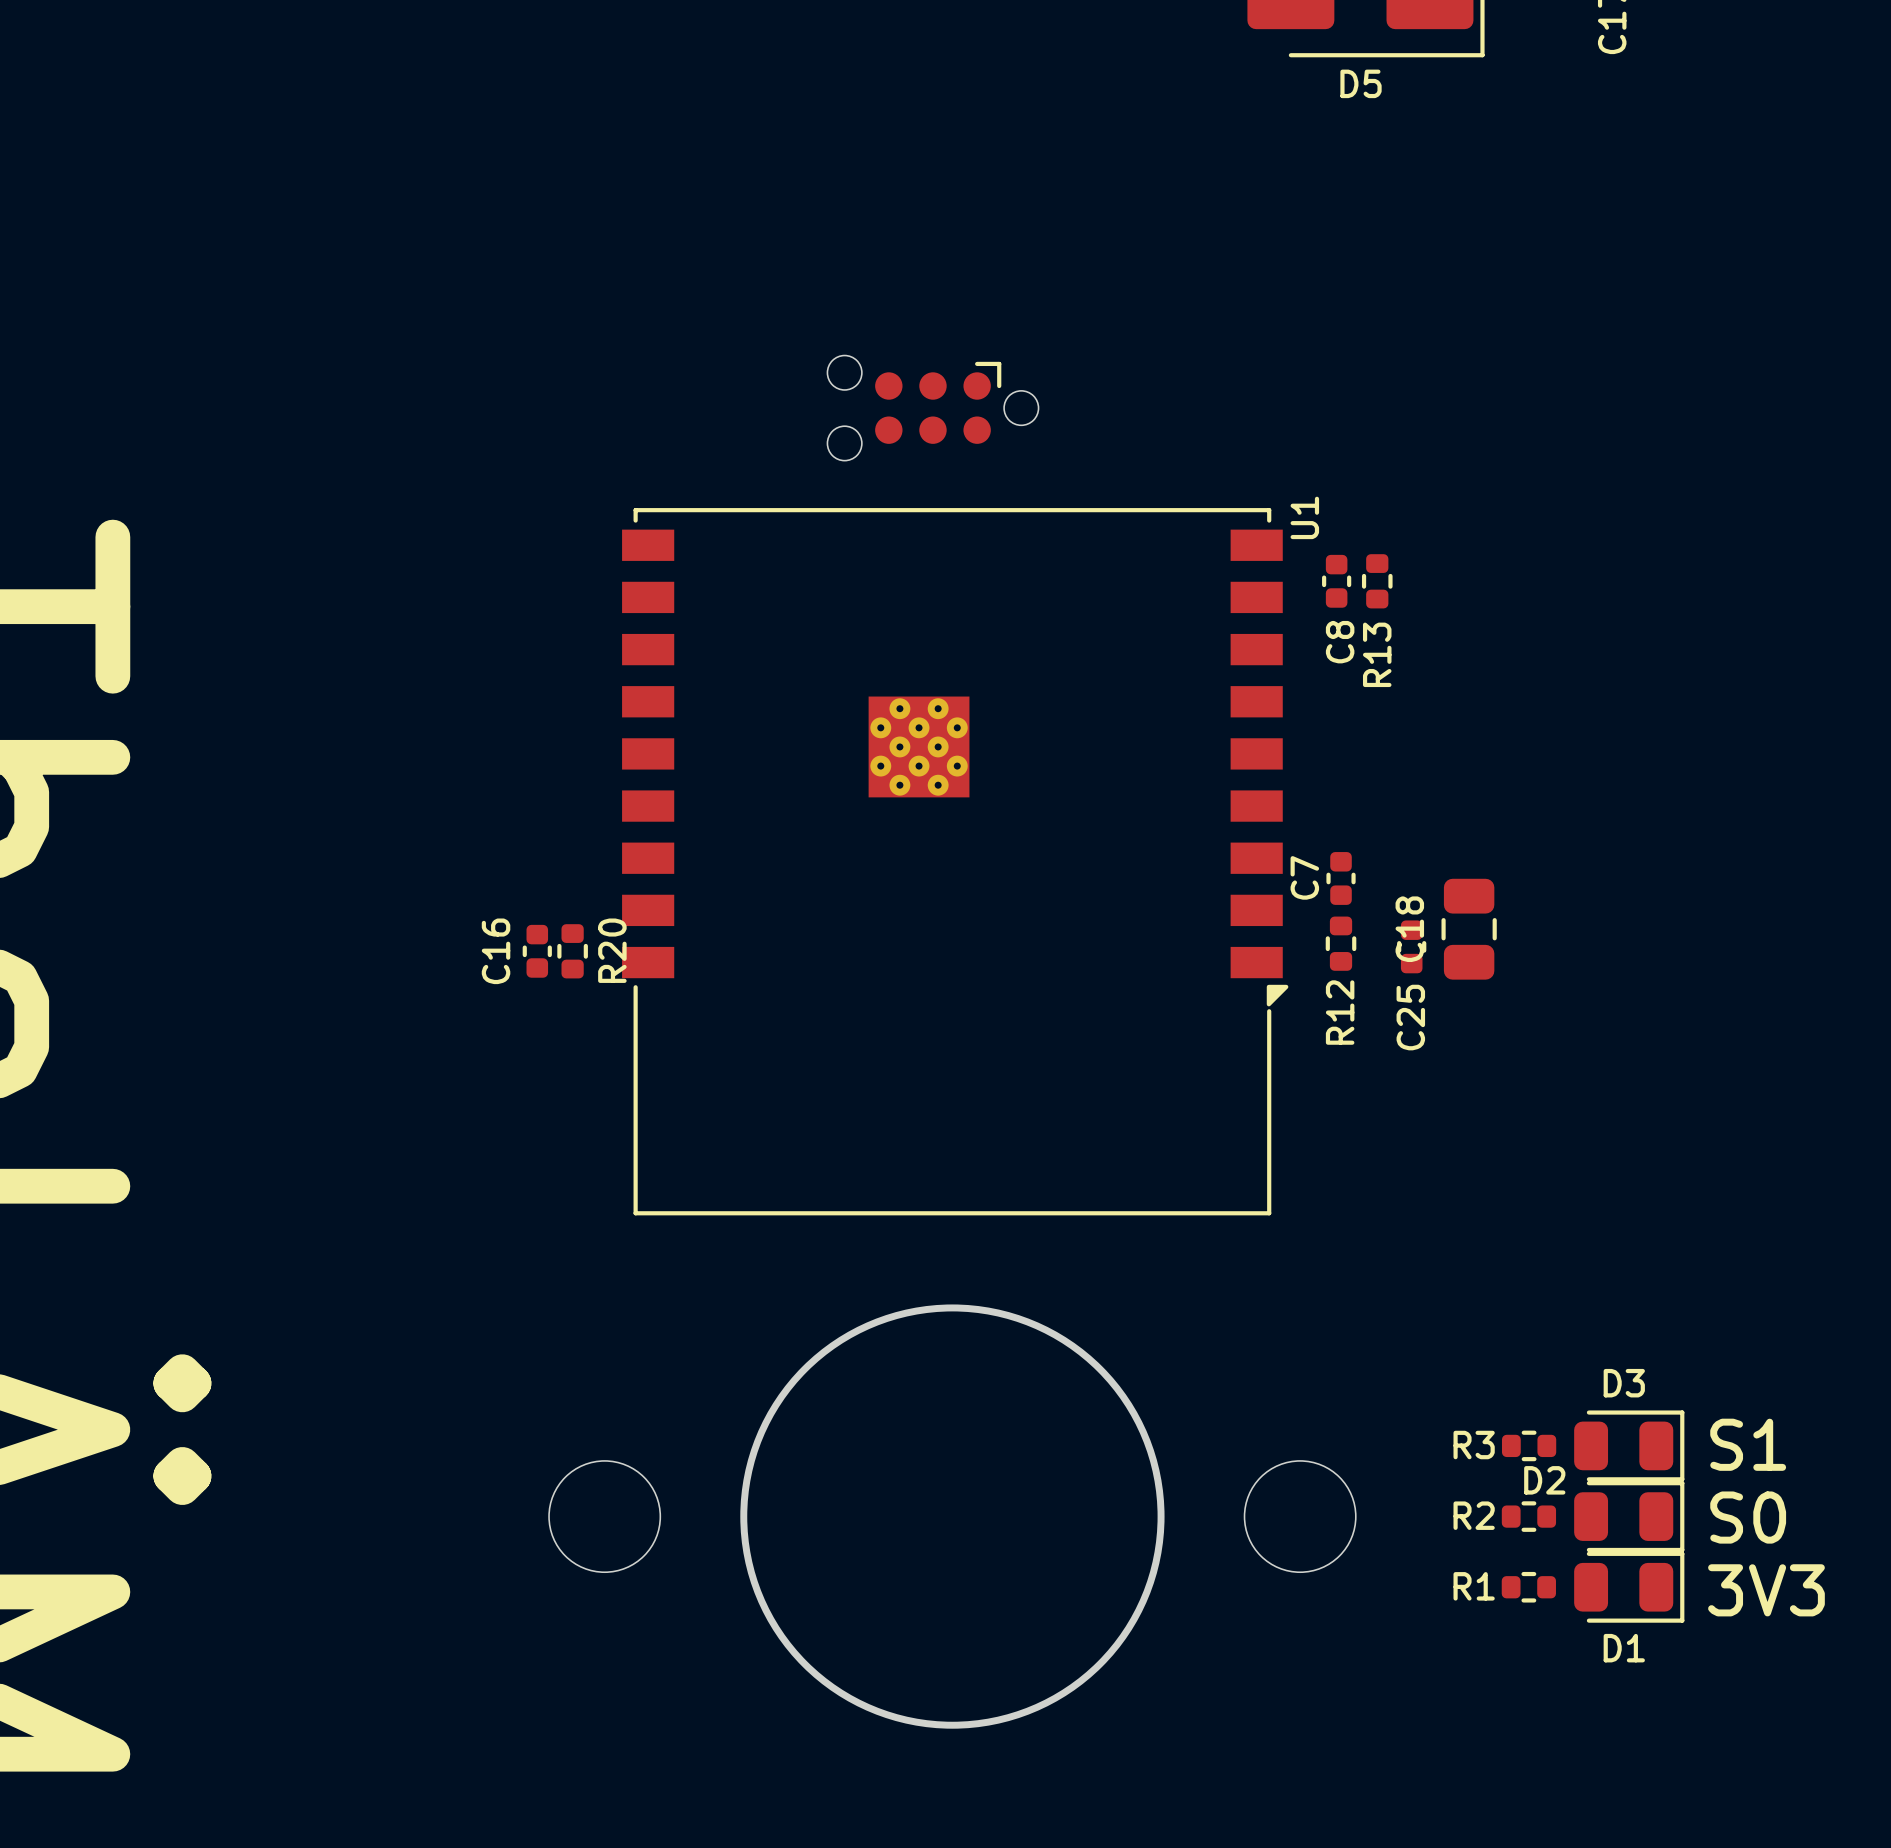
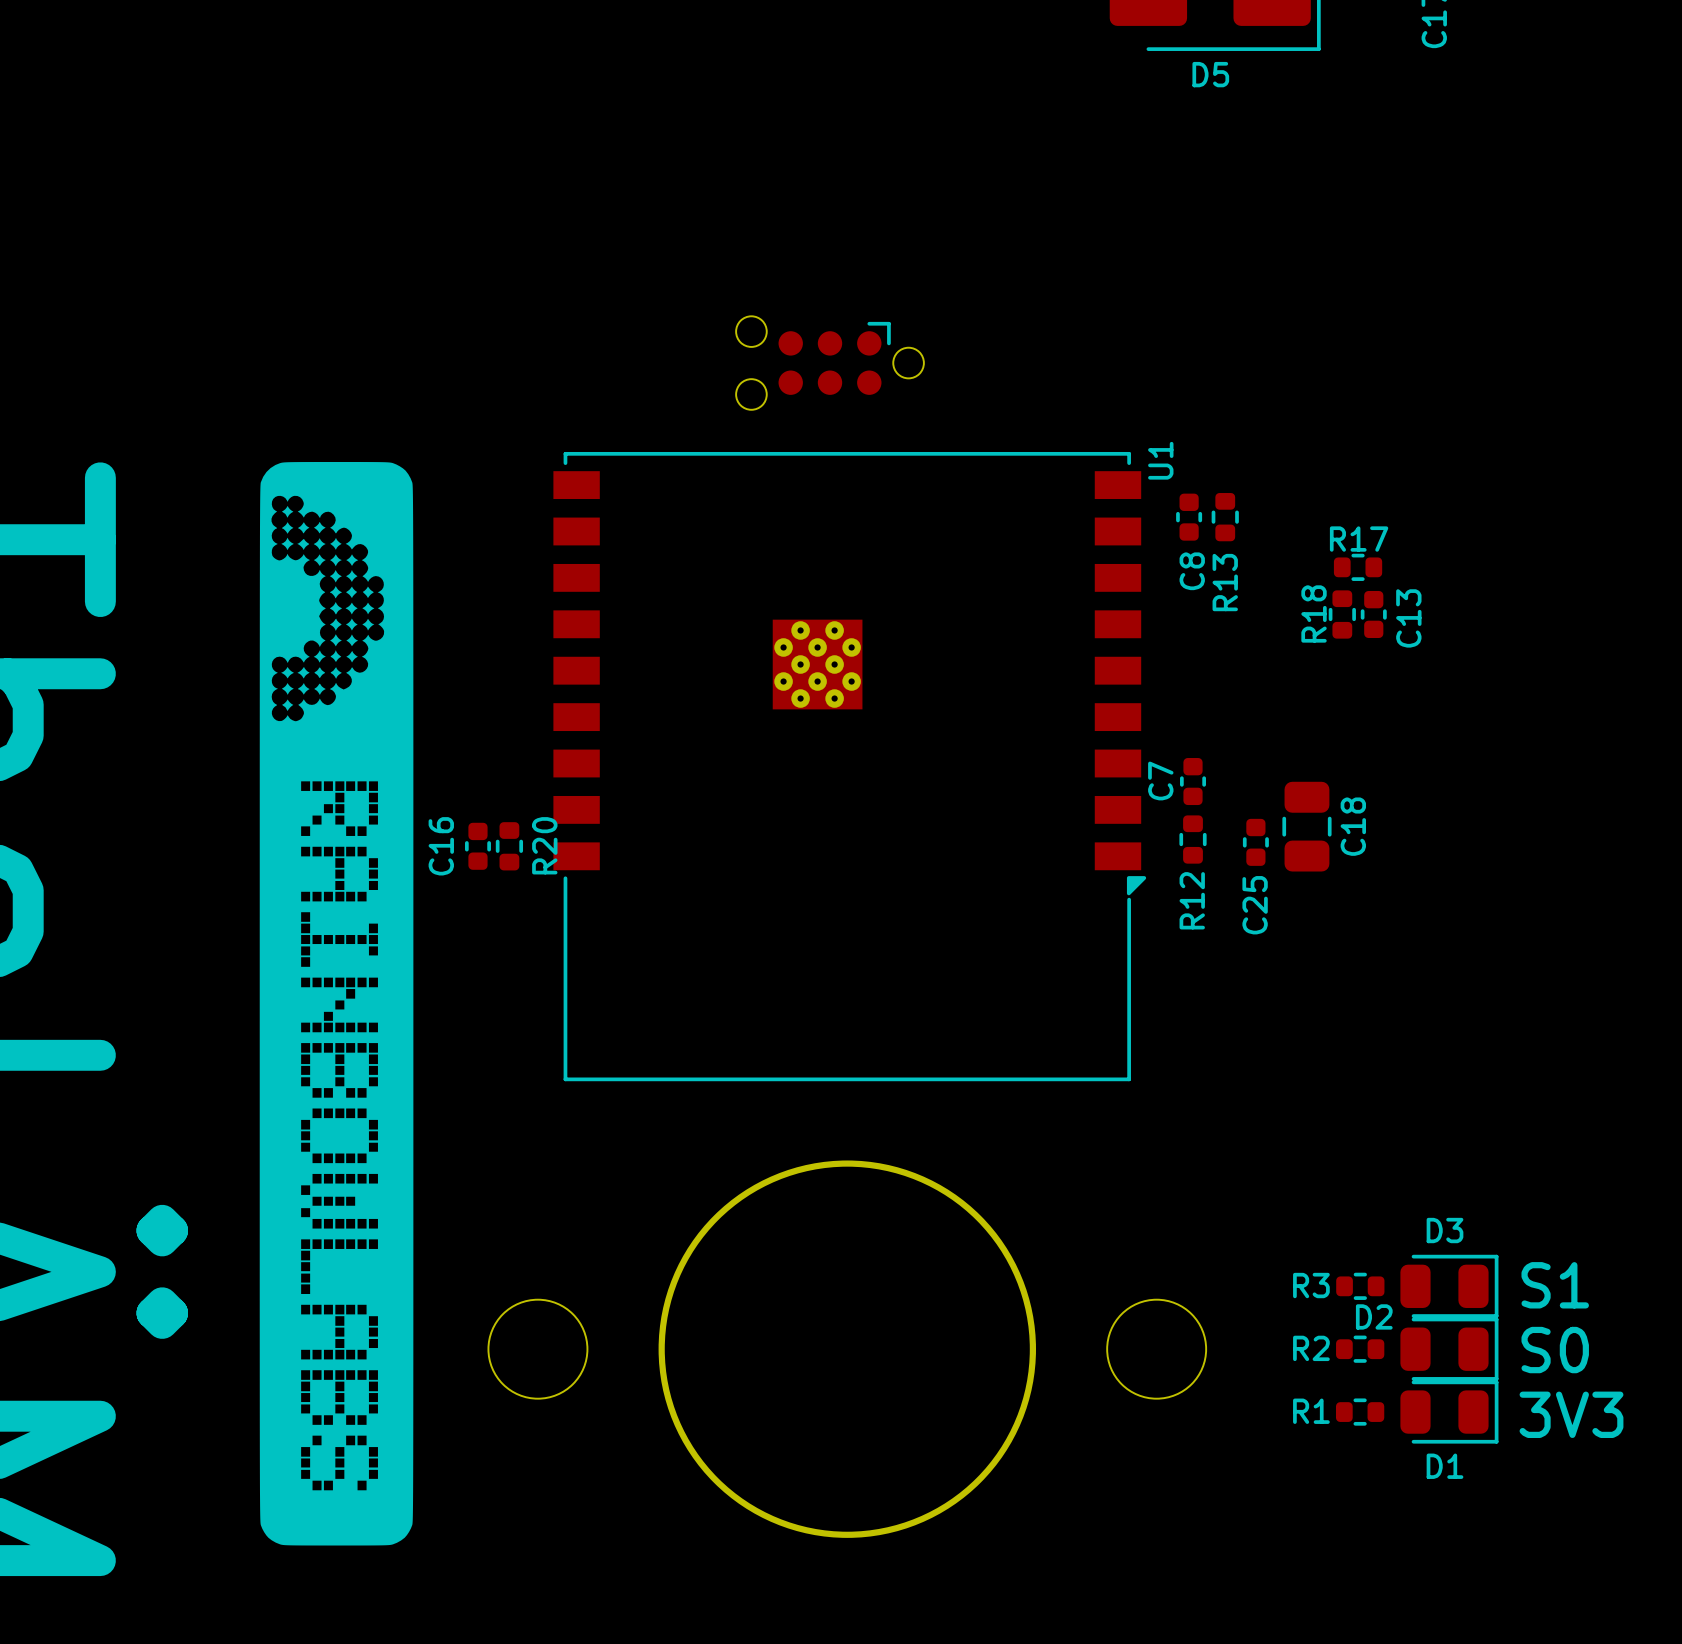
drawing: none -> [259, 461, 414, 1546]
R17: none -> (1358, 567)
R18: none -> (1342, 614)
C13: none -> (1373, 614)
C18 name position: C18 (1409, 929) -> C18 (1353, 826)

